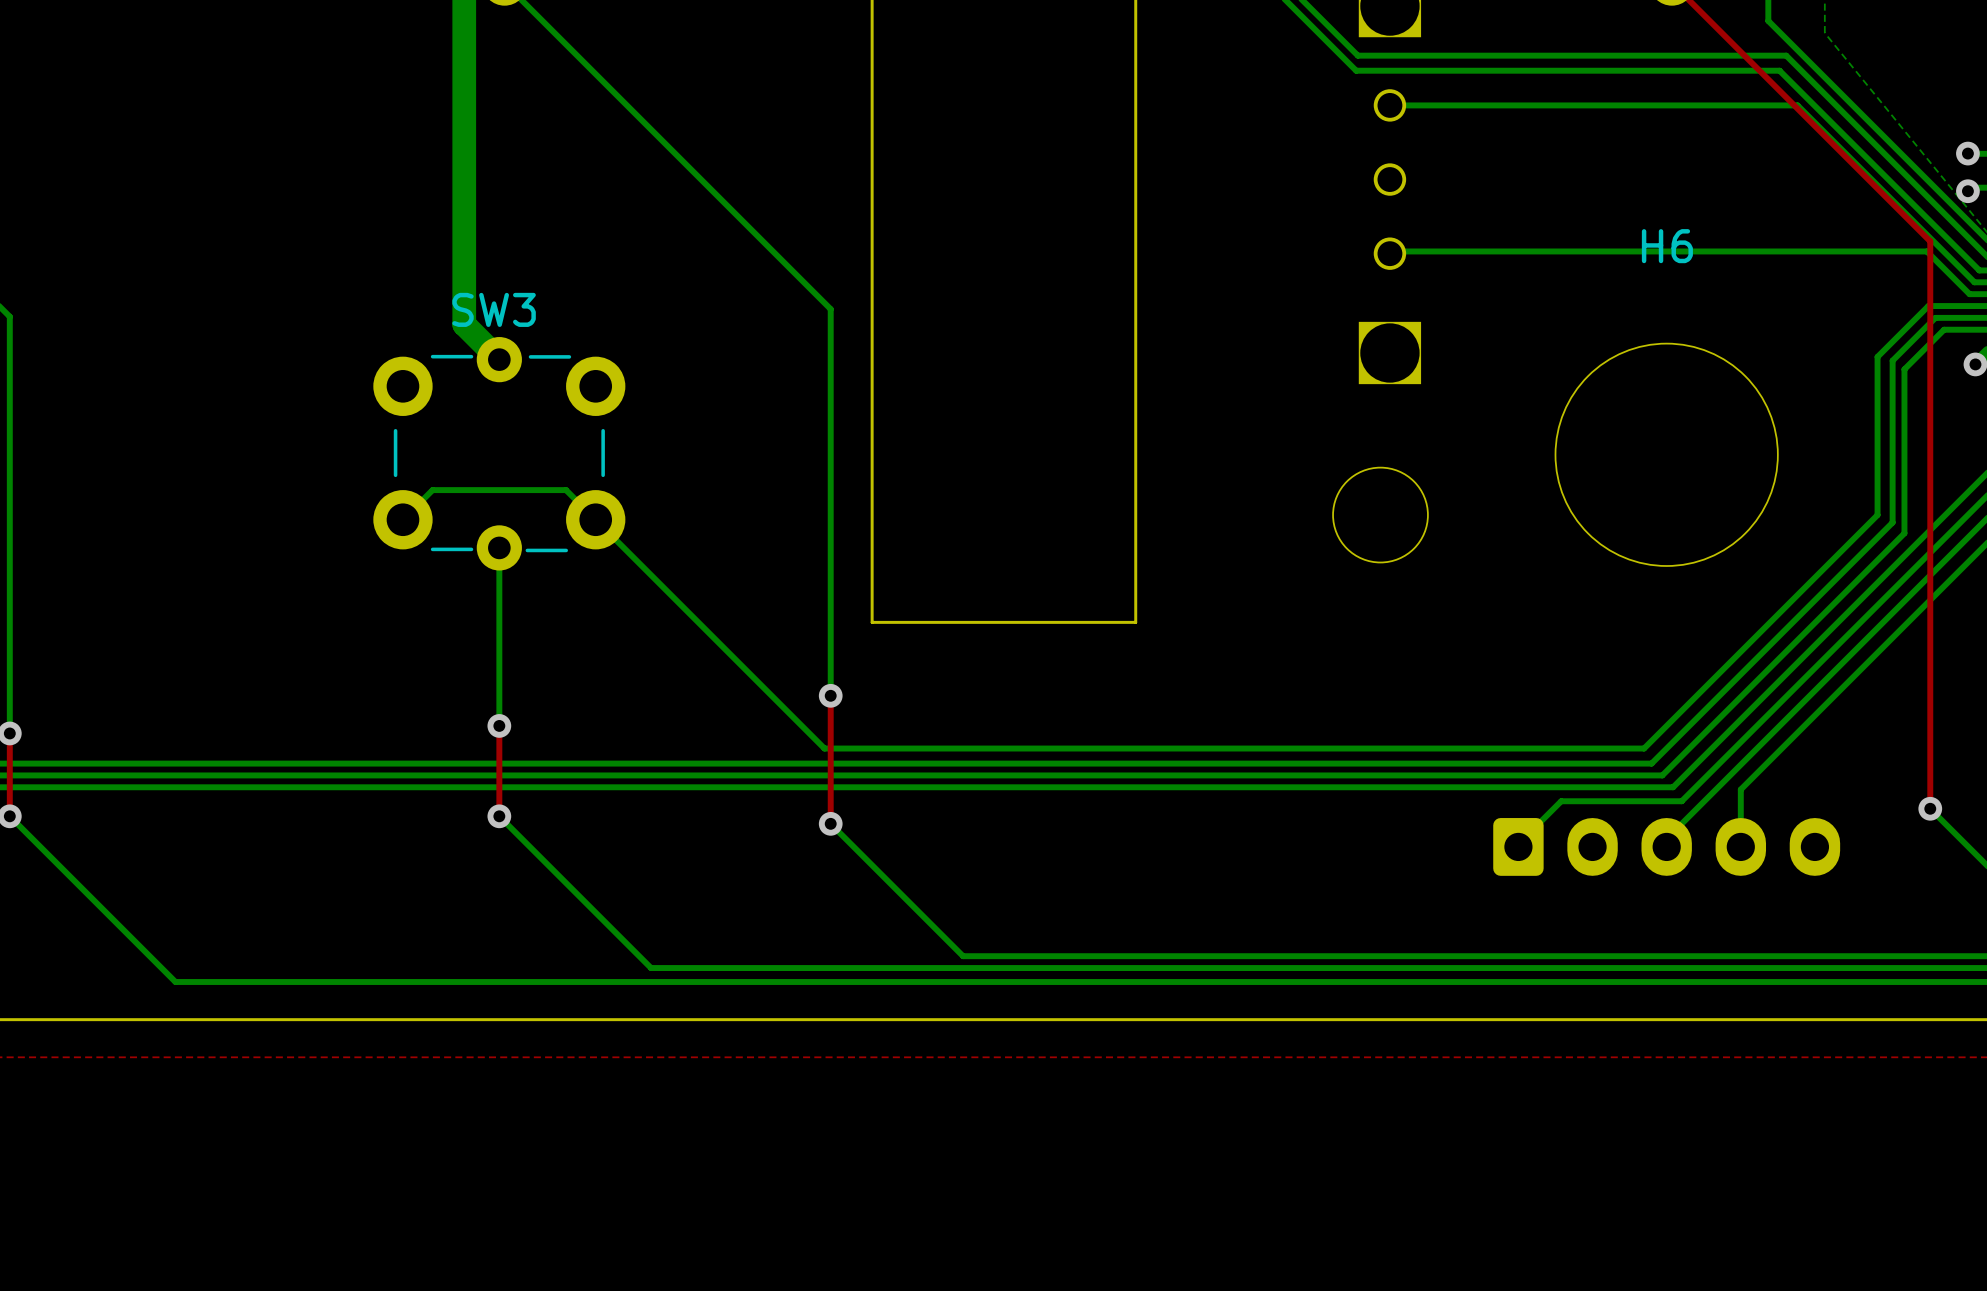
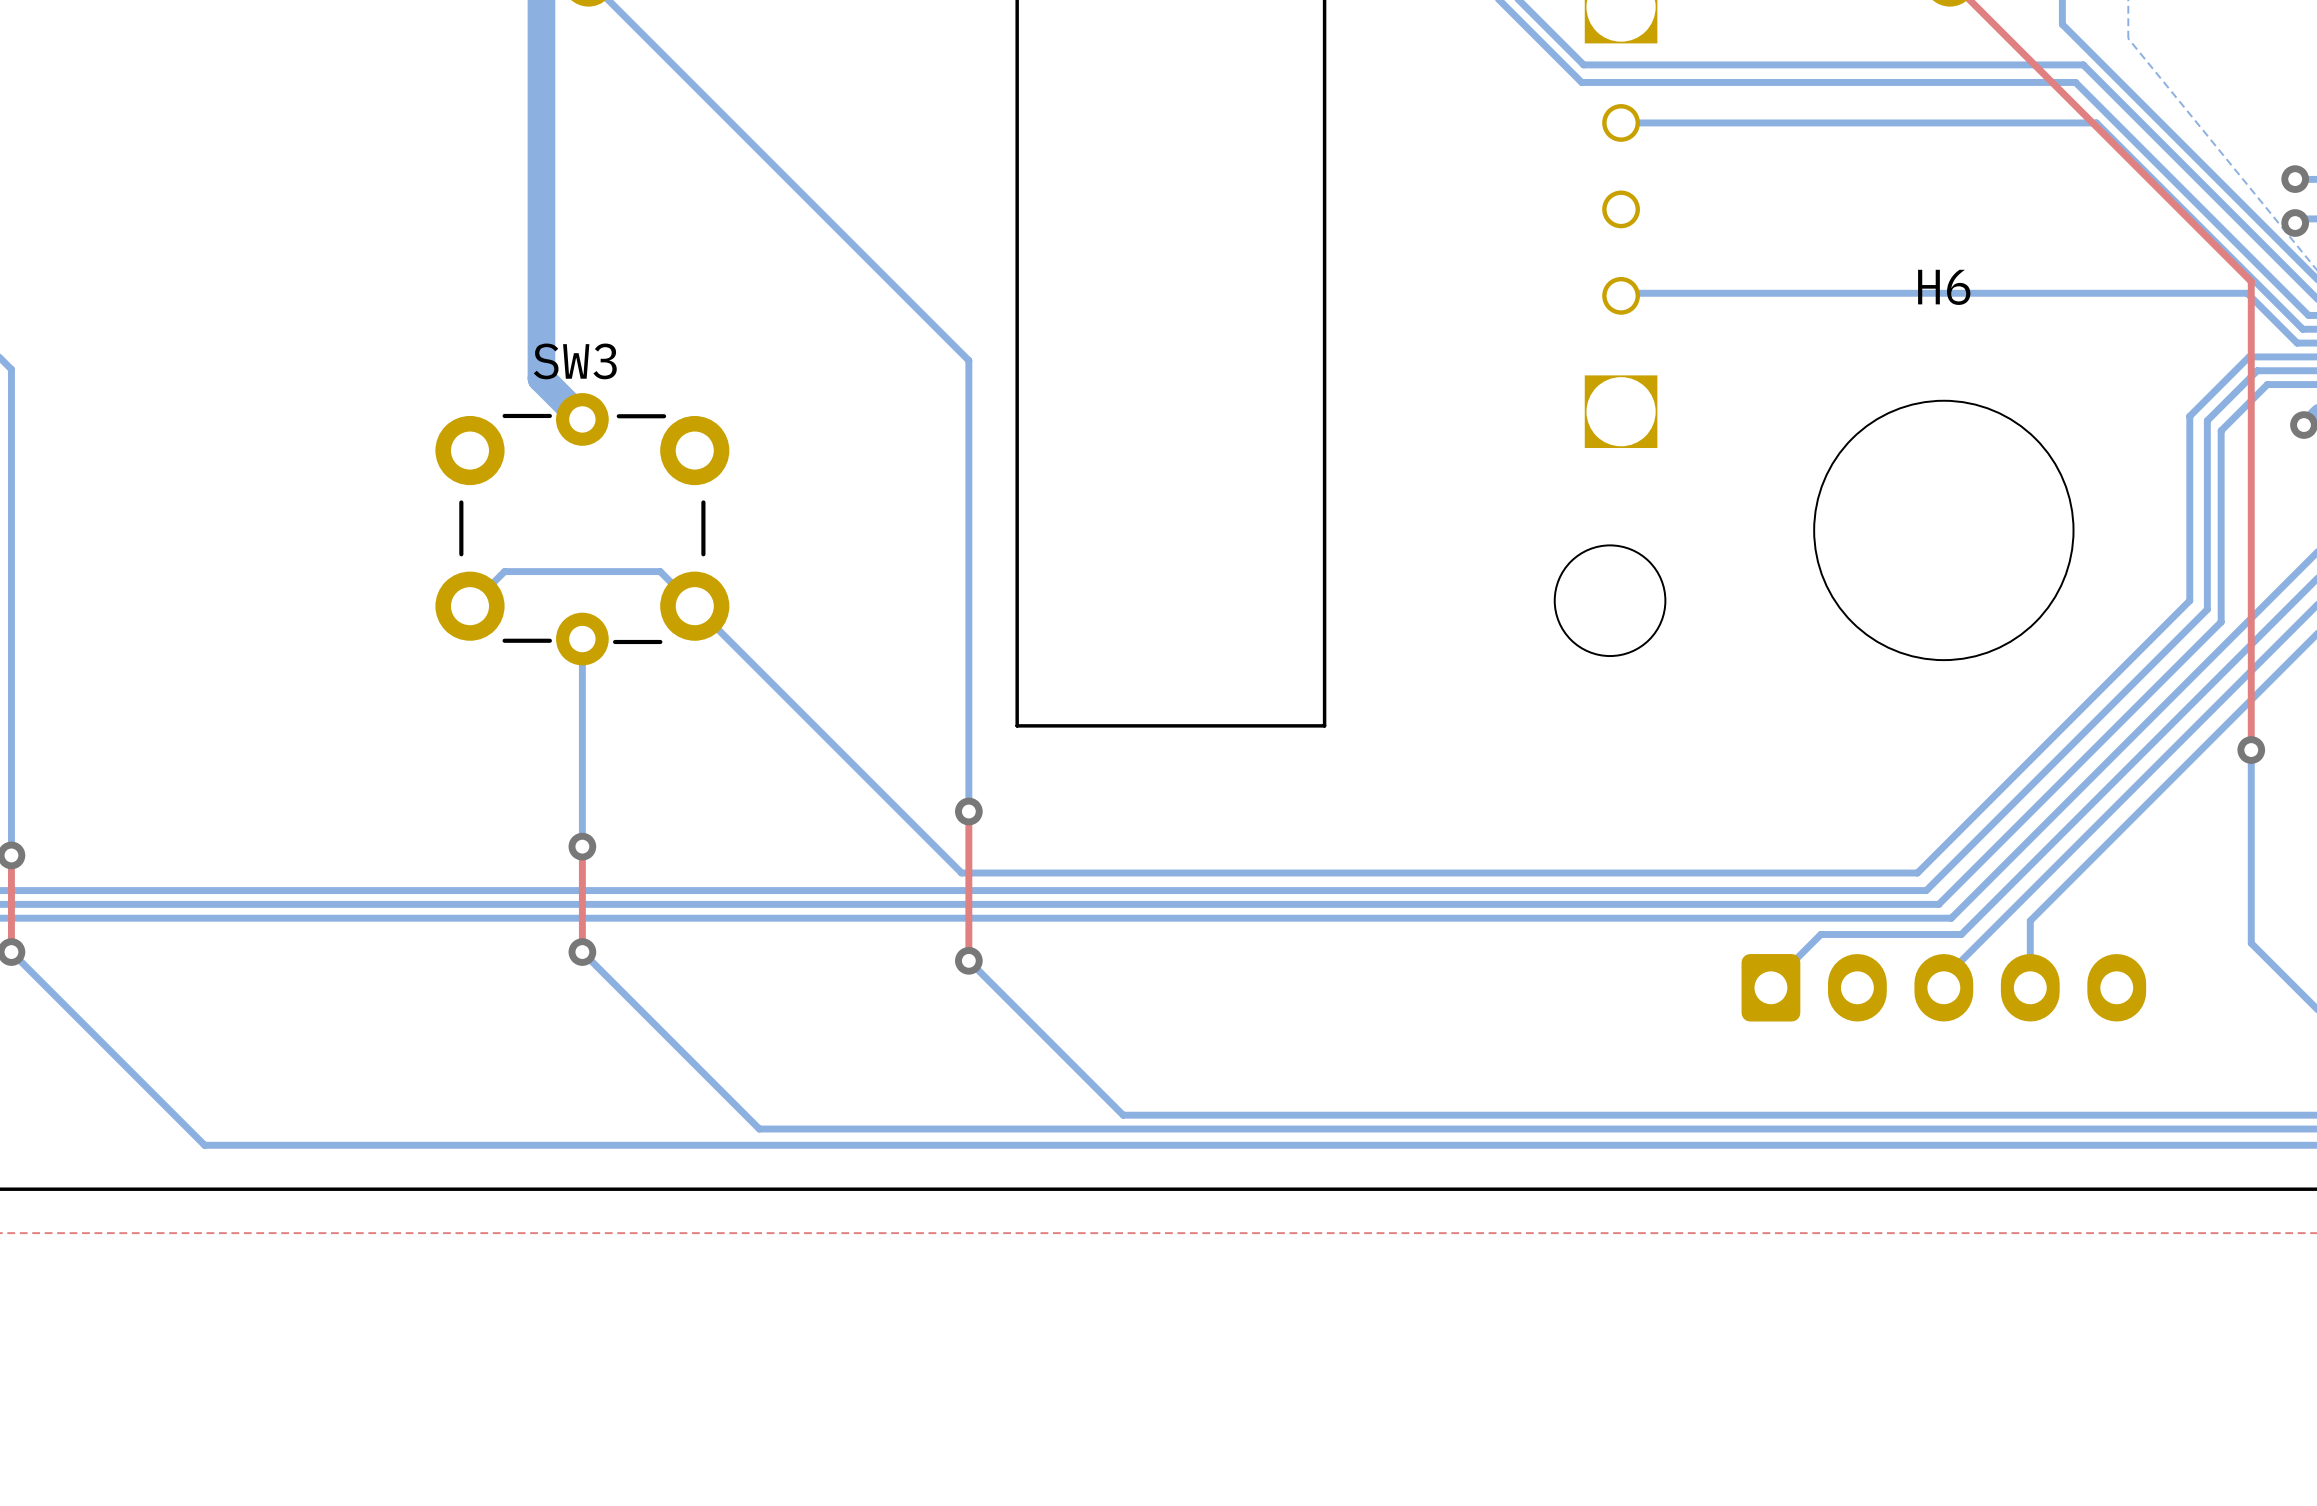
bottom track: none -> (2251, 750) (2251, 943)
top track: (1930, 643) (1930, 808) -> none
via position: (1930, 808) -> (2251, 750)

